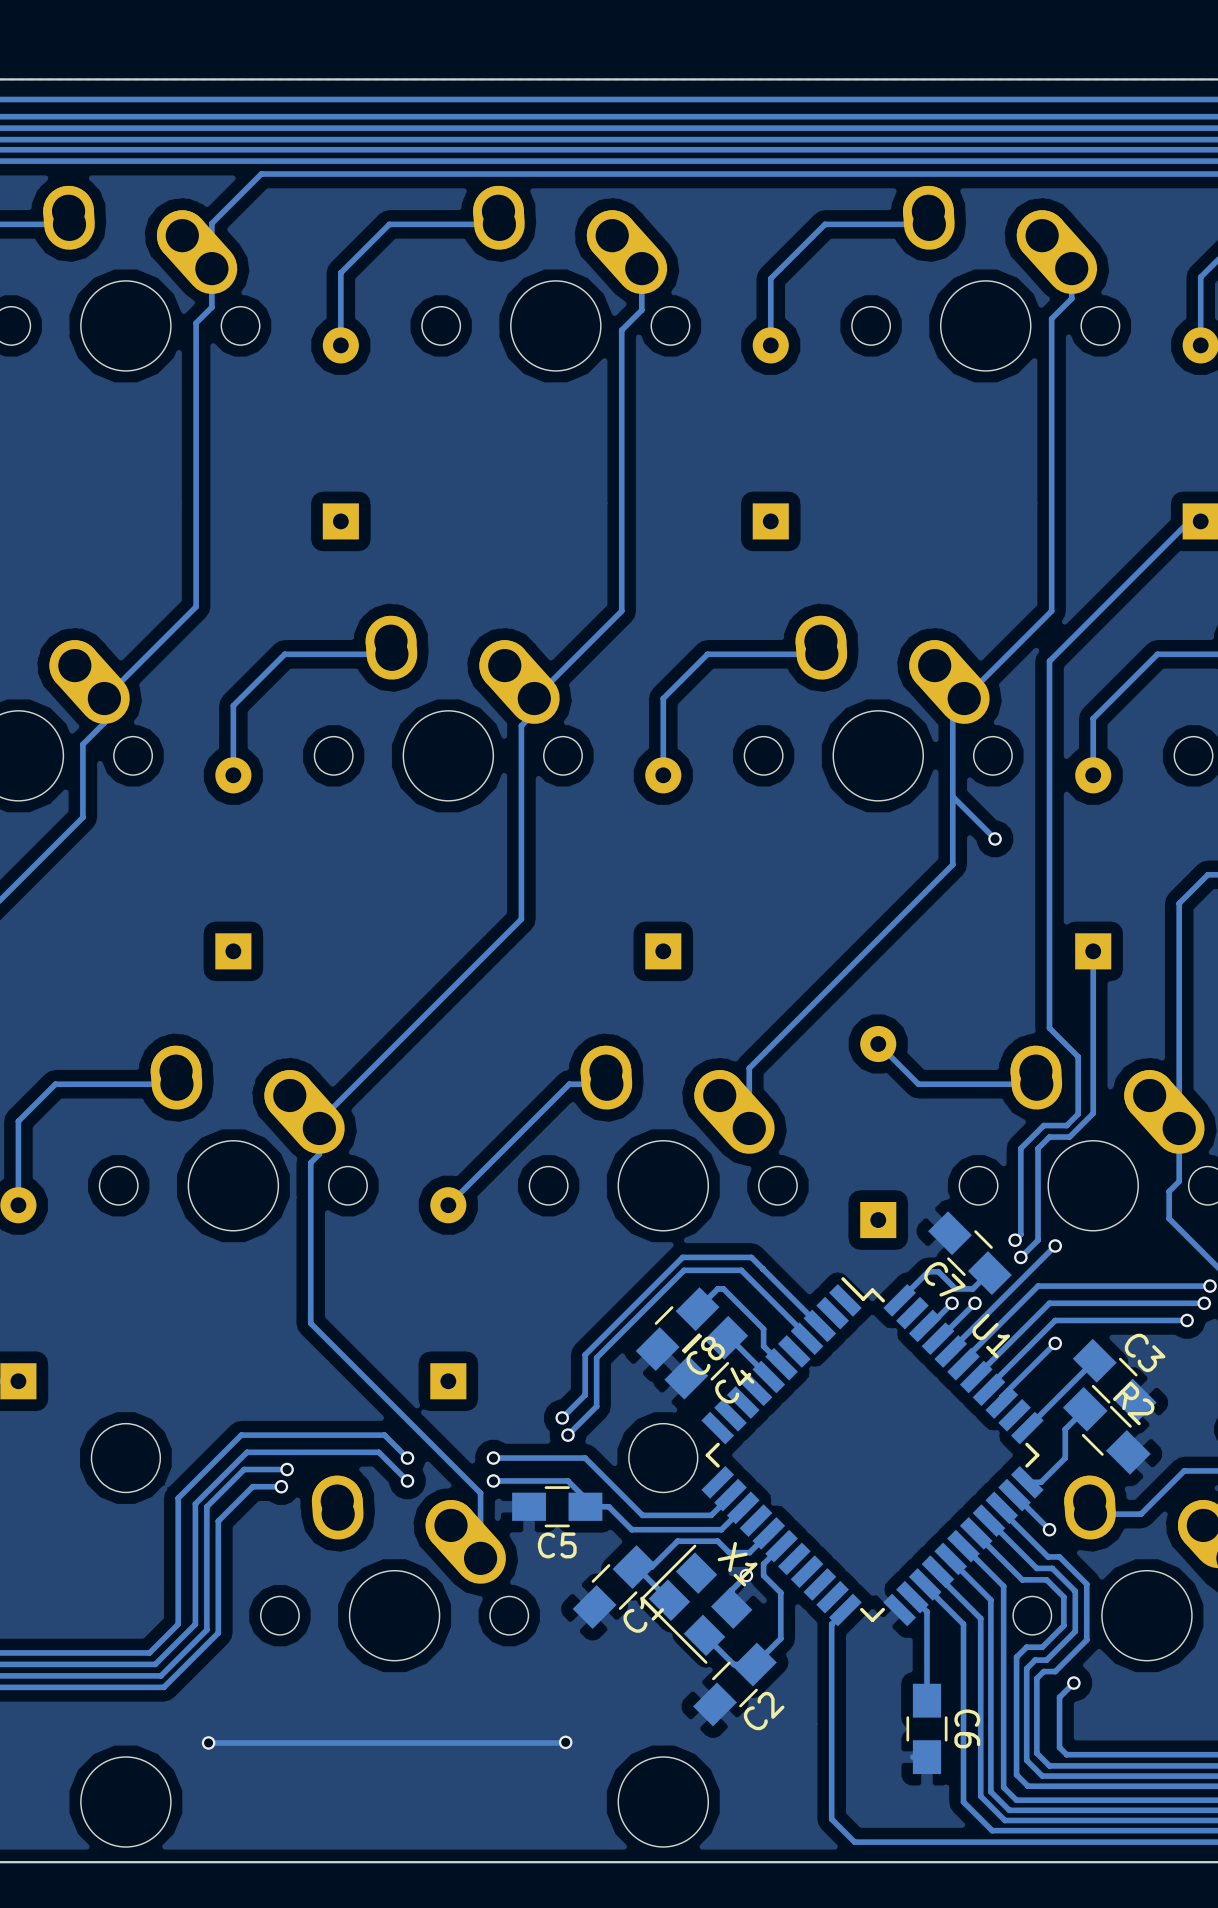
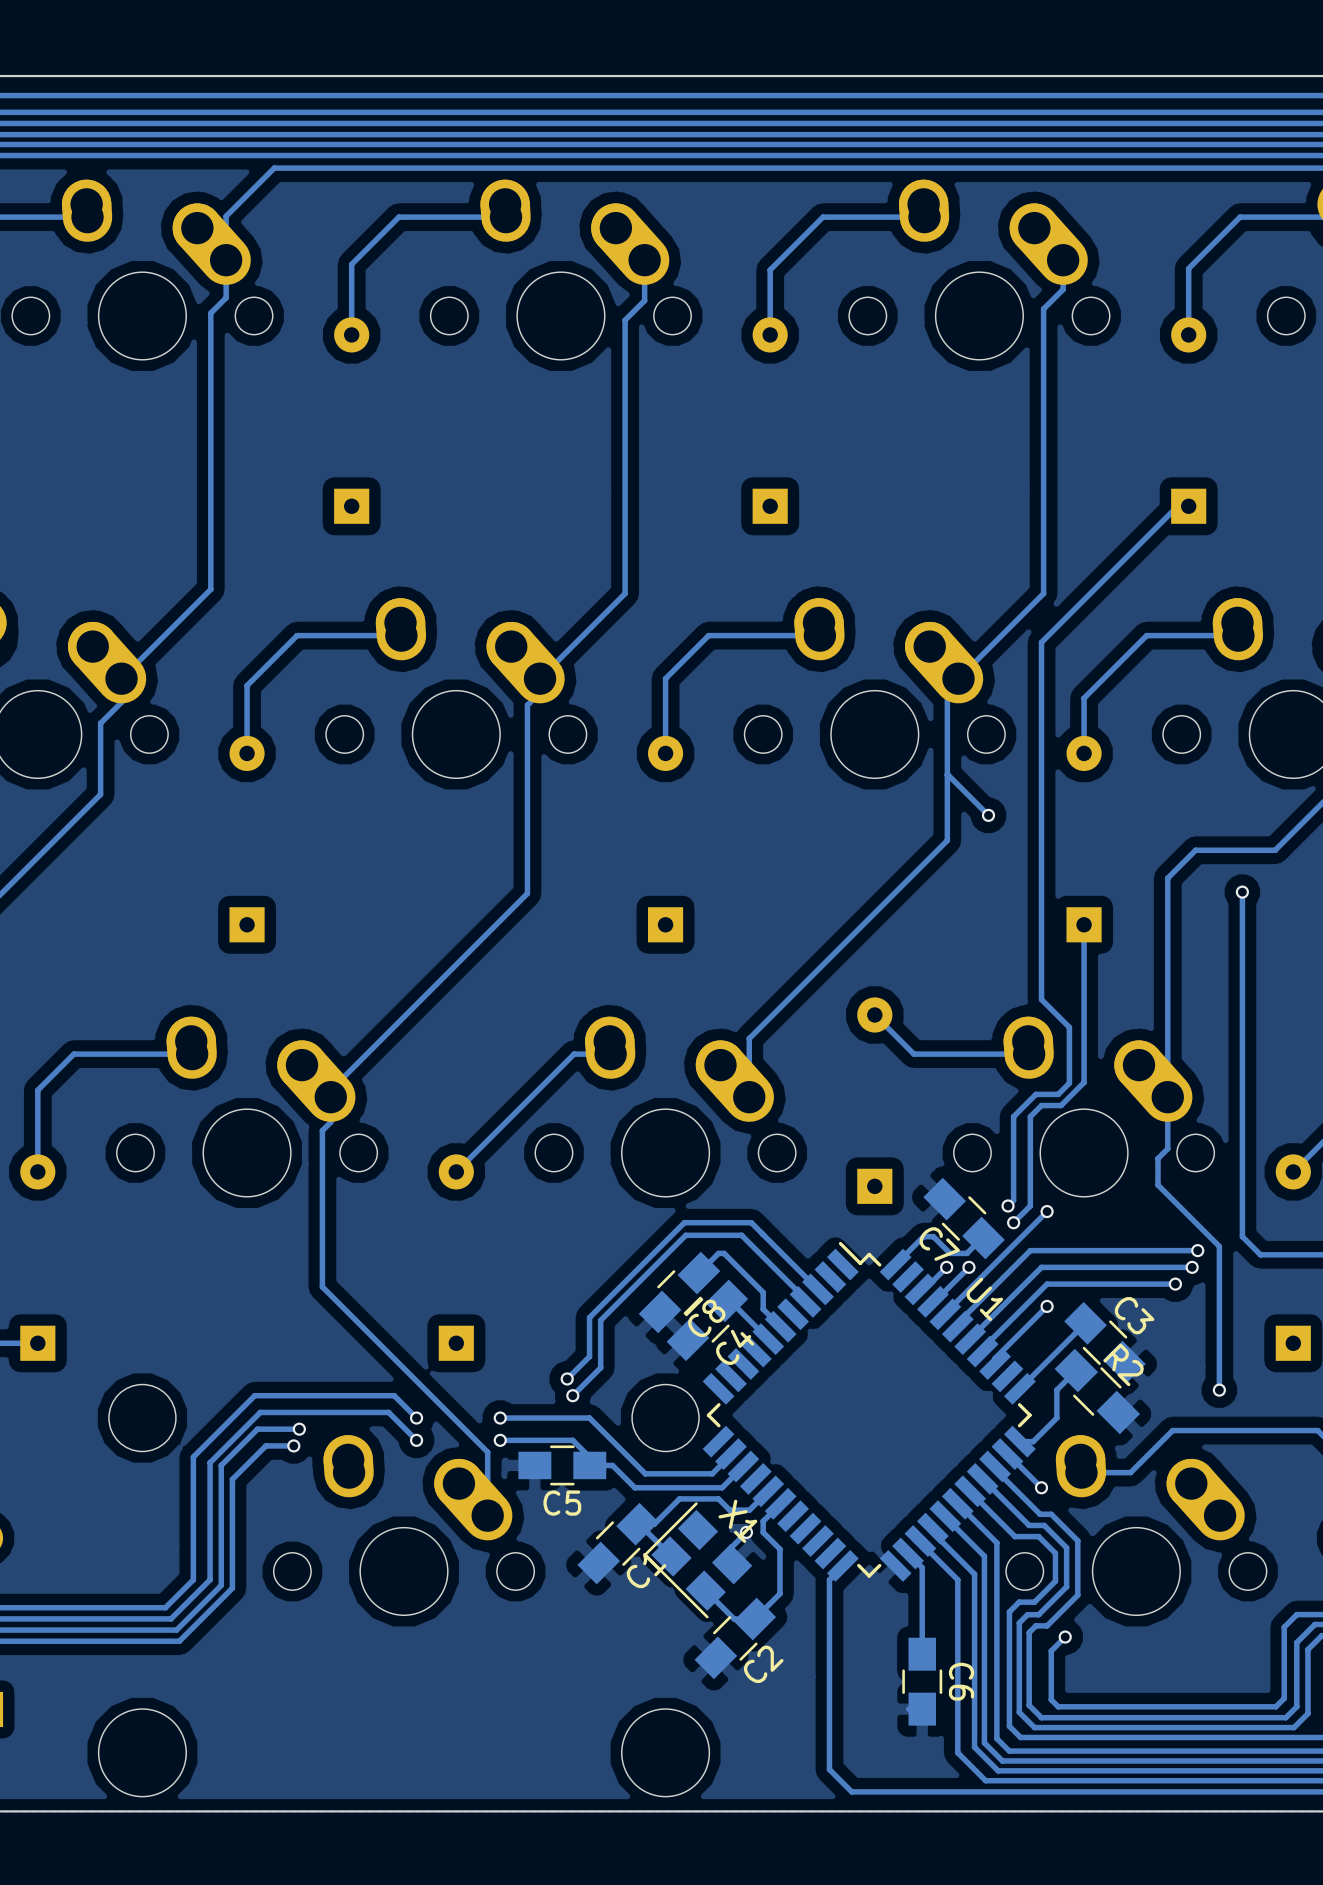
via: (208, 1742) -> none
track: (565, 1742) (208, 1742) -> none
via: (565, 1742) -> none

